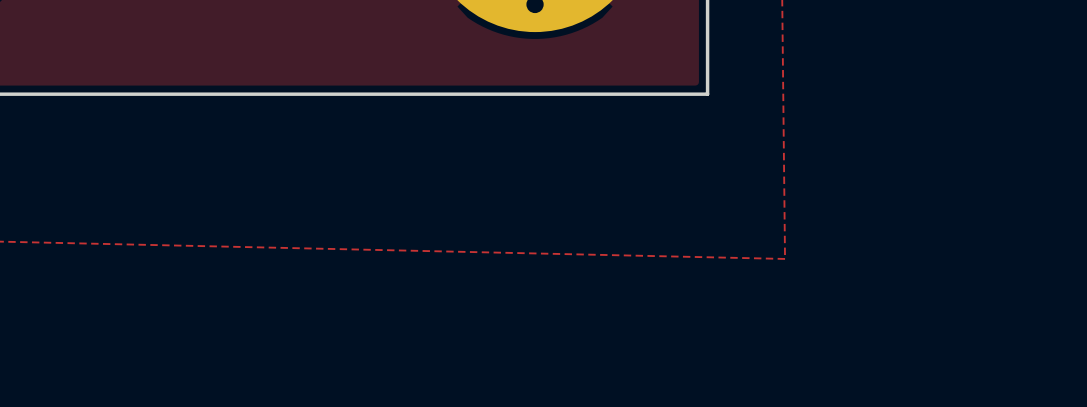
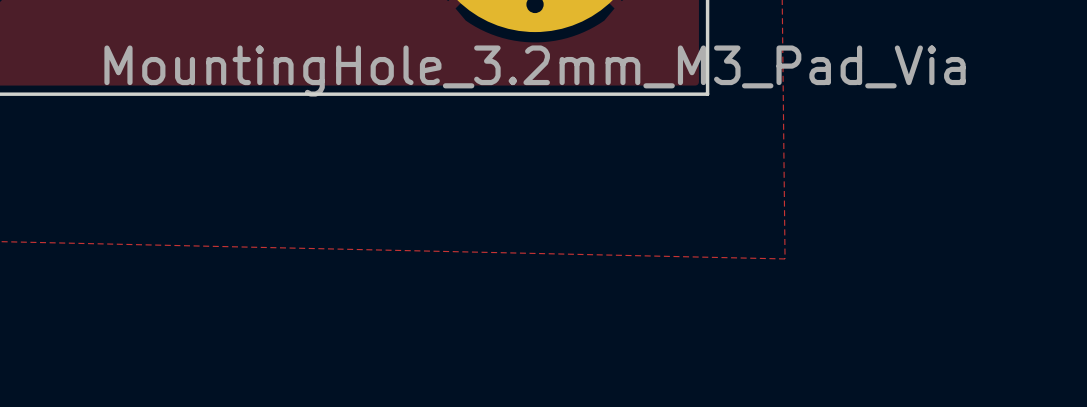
part value: none -> MountingHole_3.2mm_M3_Pad_Via (535, 71)

